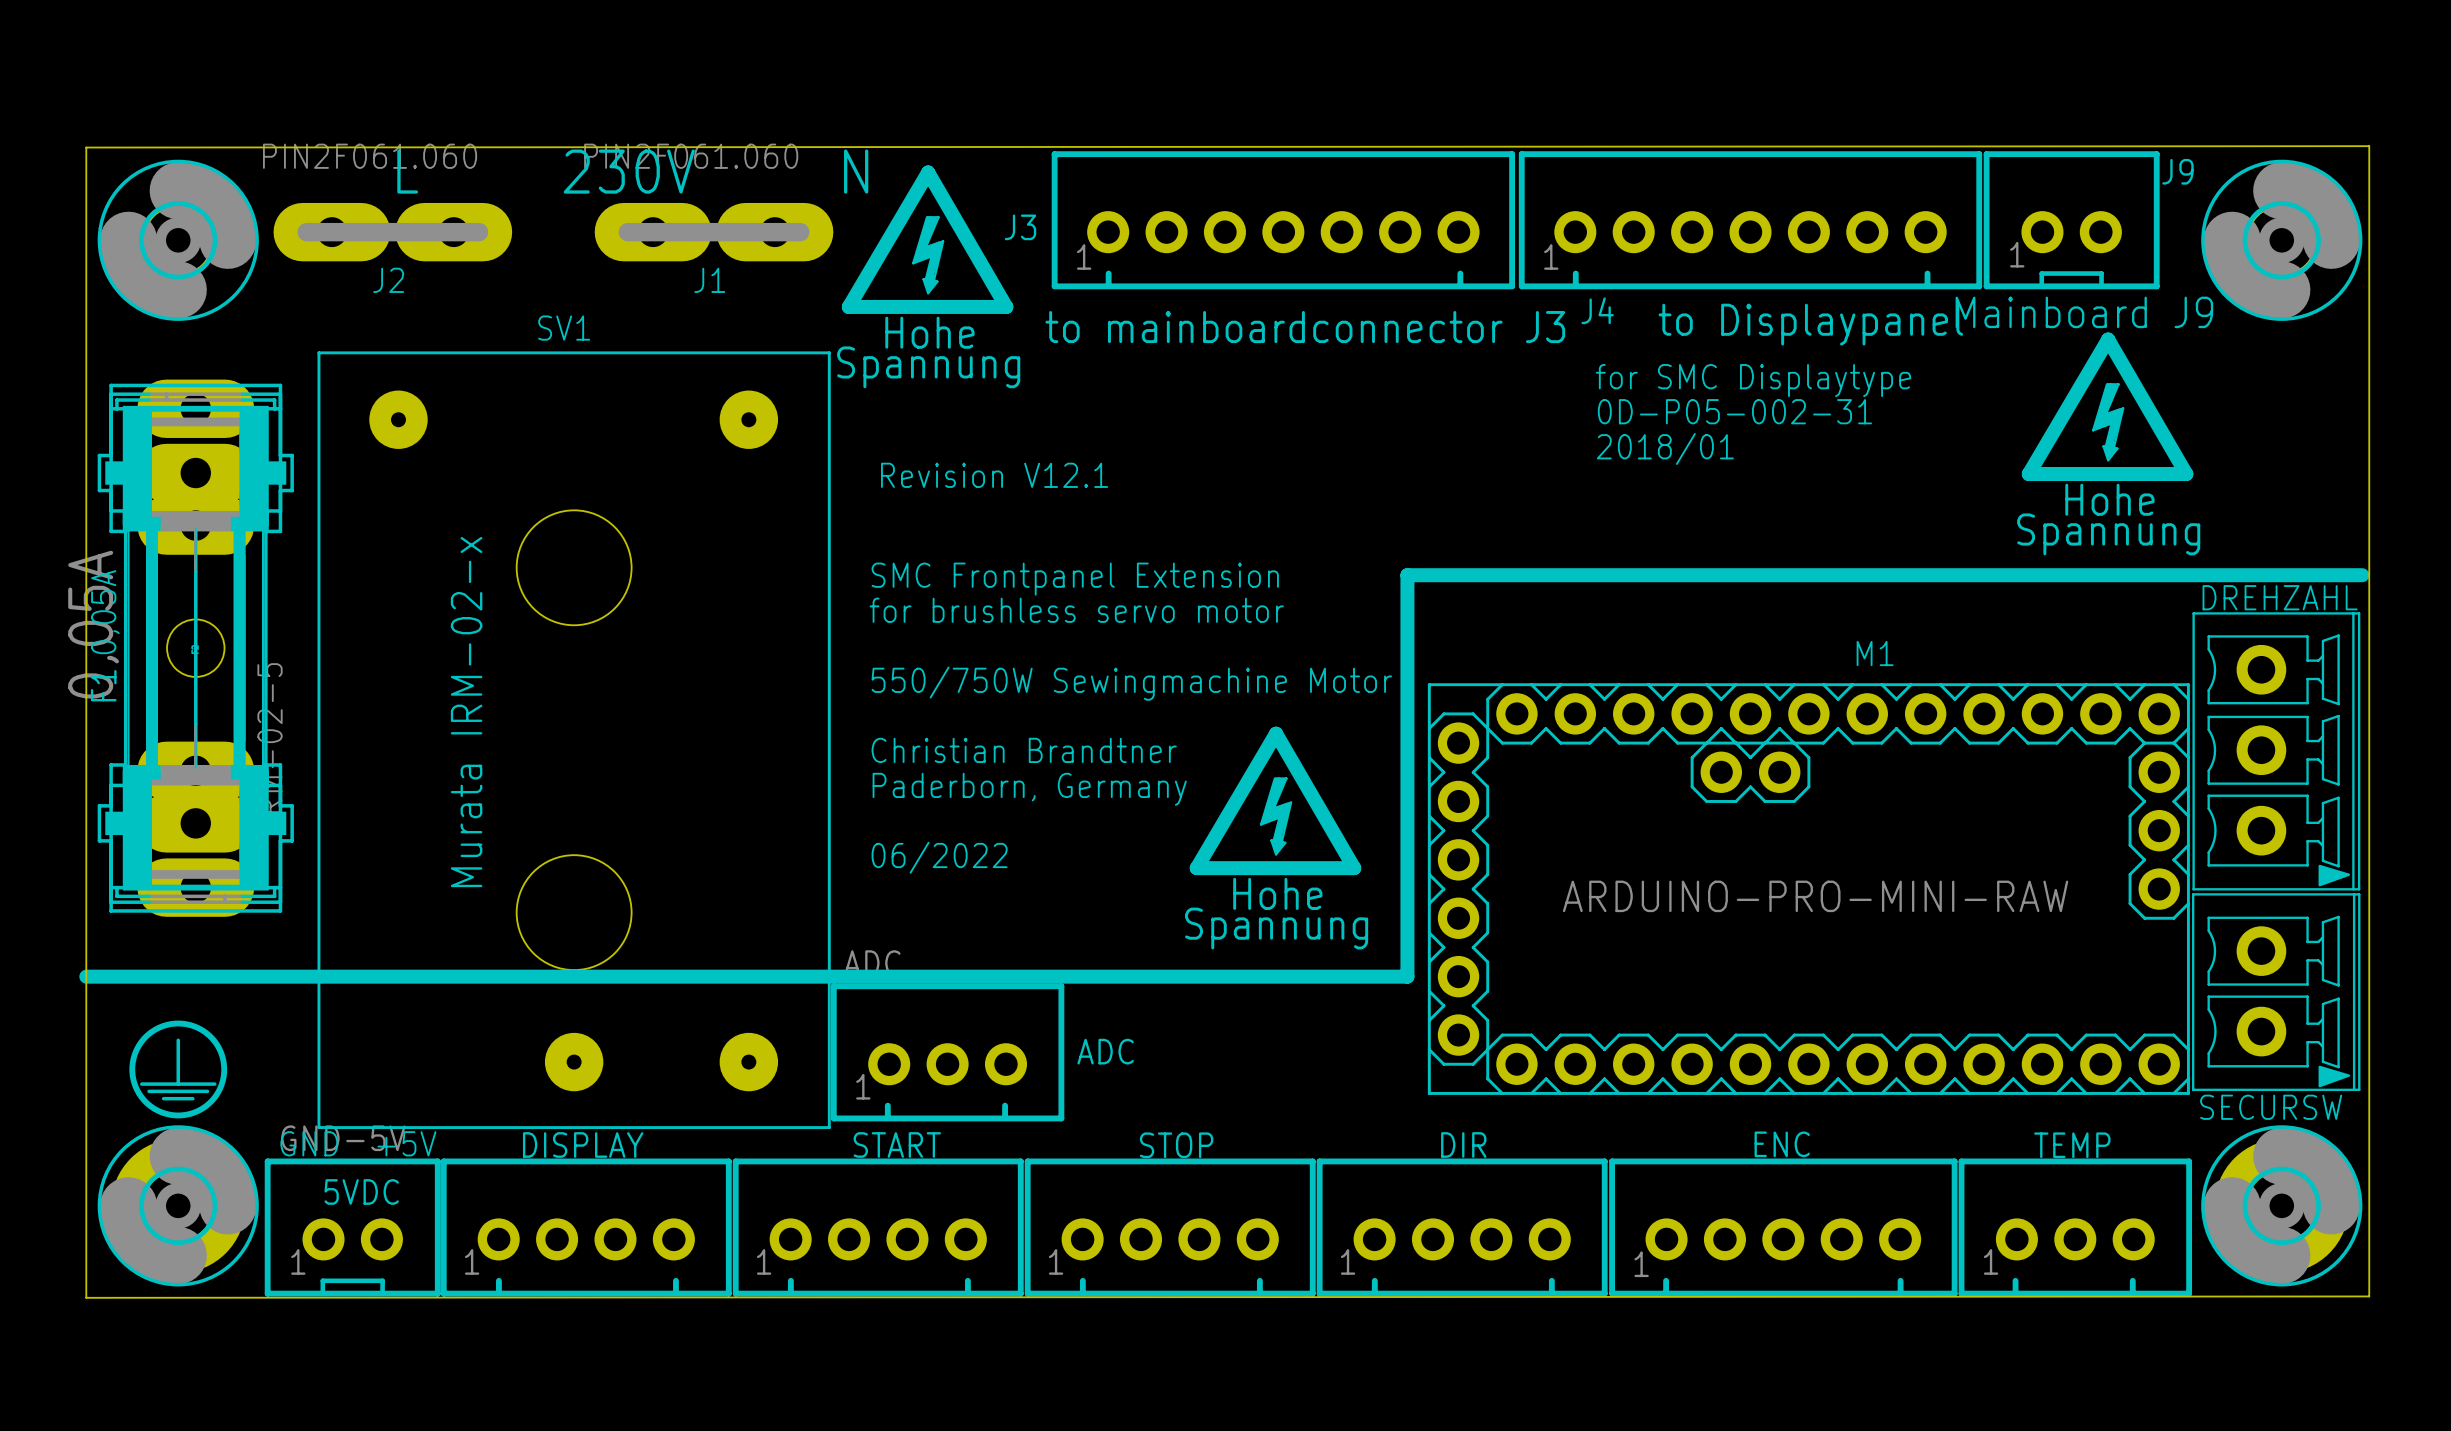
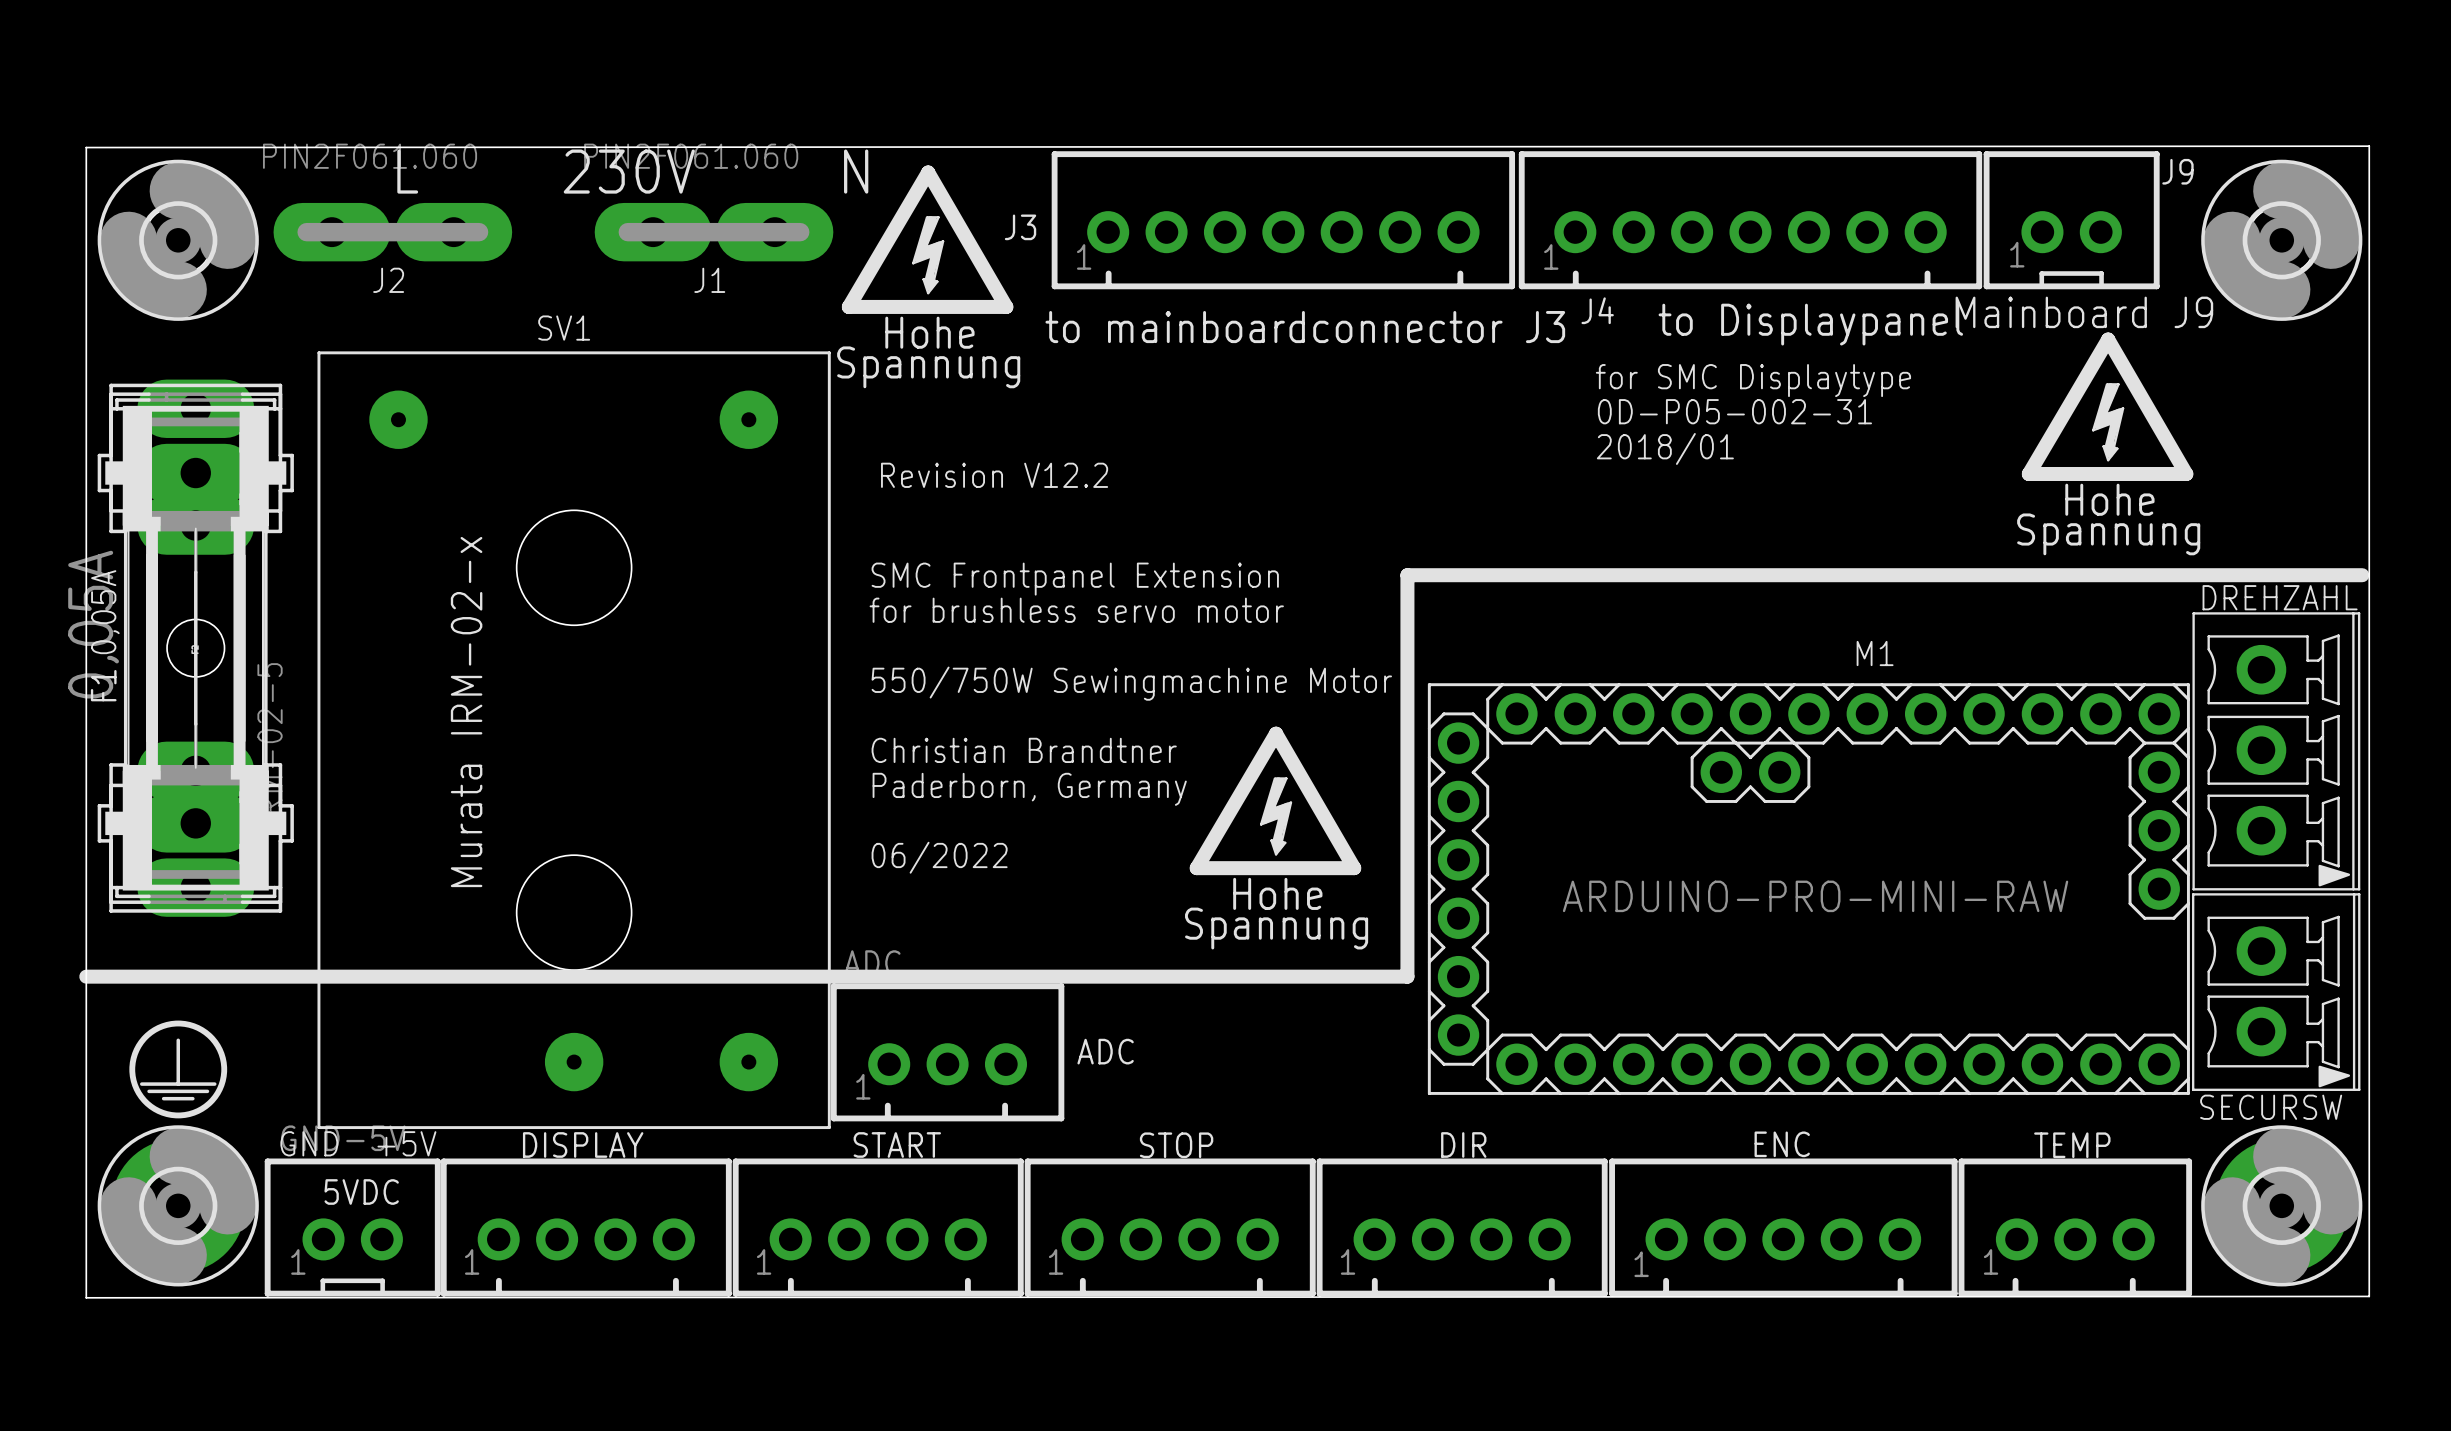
text: Revision V12.1 (994, 475) -> Revision V12.2 (994, 475)

